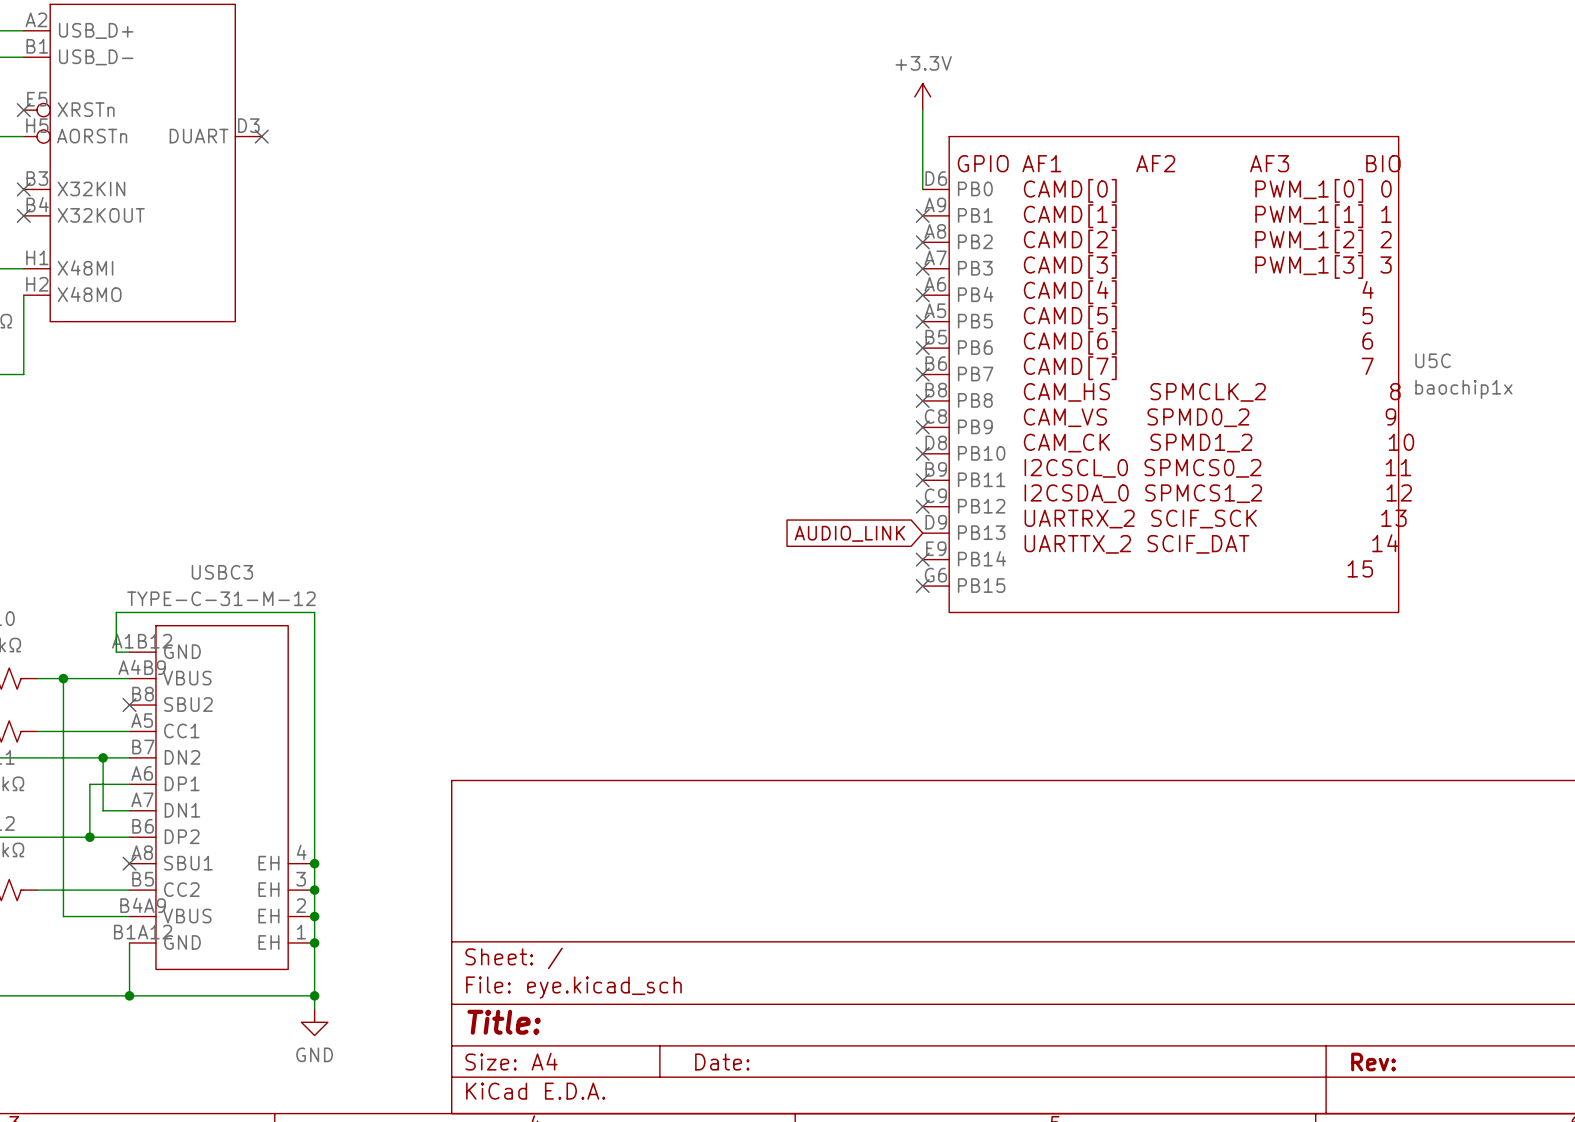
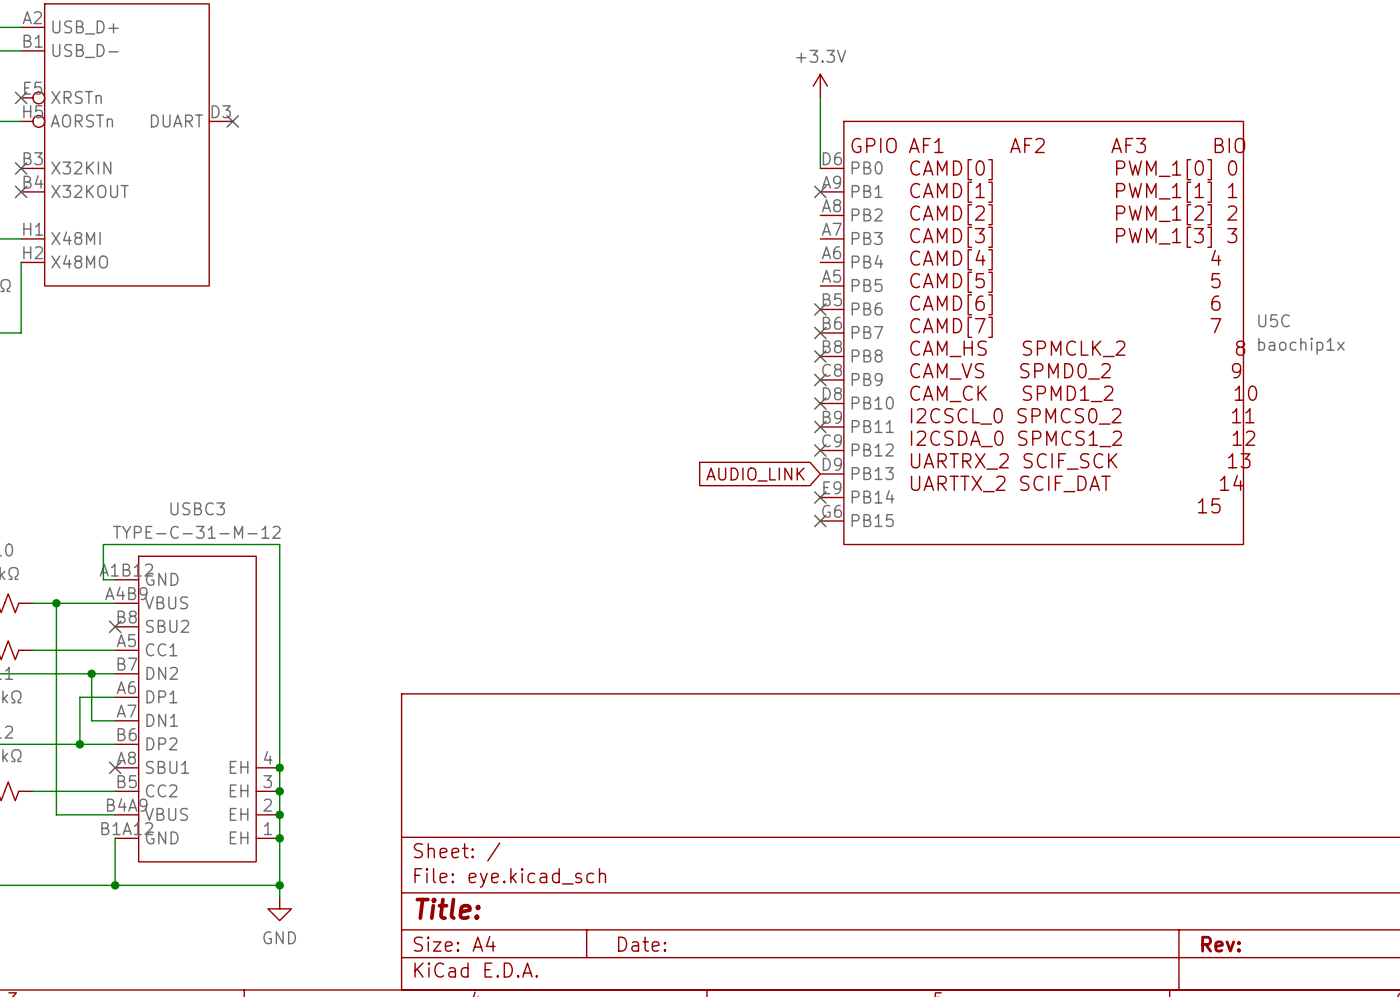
no-connect mark: (922, 242) -> none
no-connect mark: (922, 268) -> none
no-connect mark: (922, 295) -> none
no-connect mark: (922, 321) -> none

